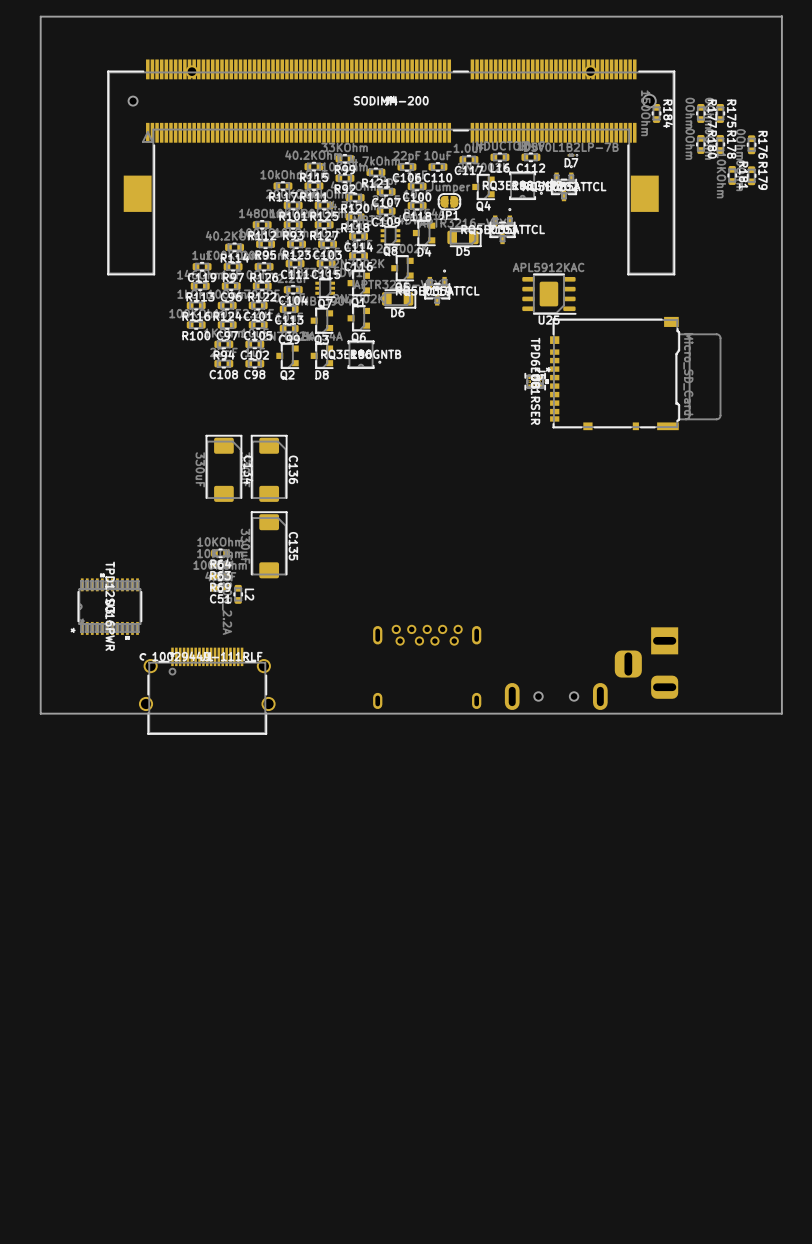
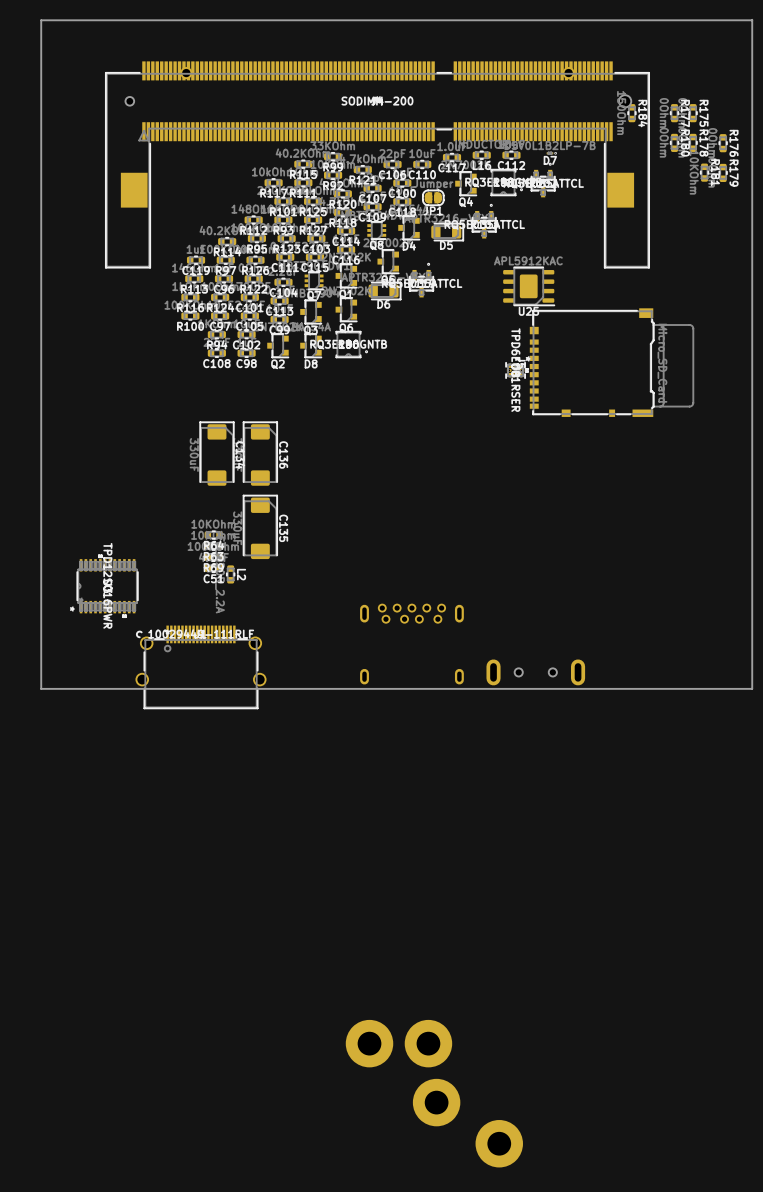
part: (646, 663) -> none
part: none -> (369, 1043)
part: none -> (428, 1043)
part: none -> (436, 1102)
part: none -> (499, 1143)

